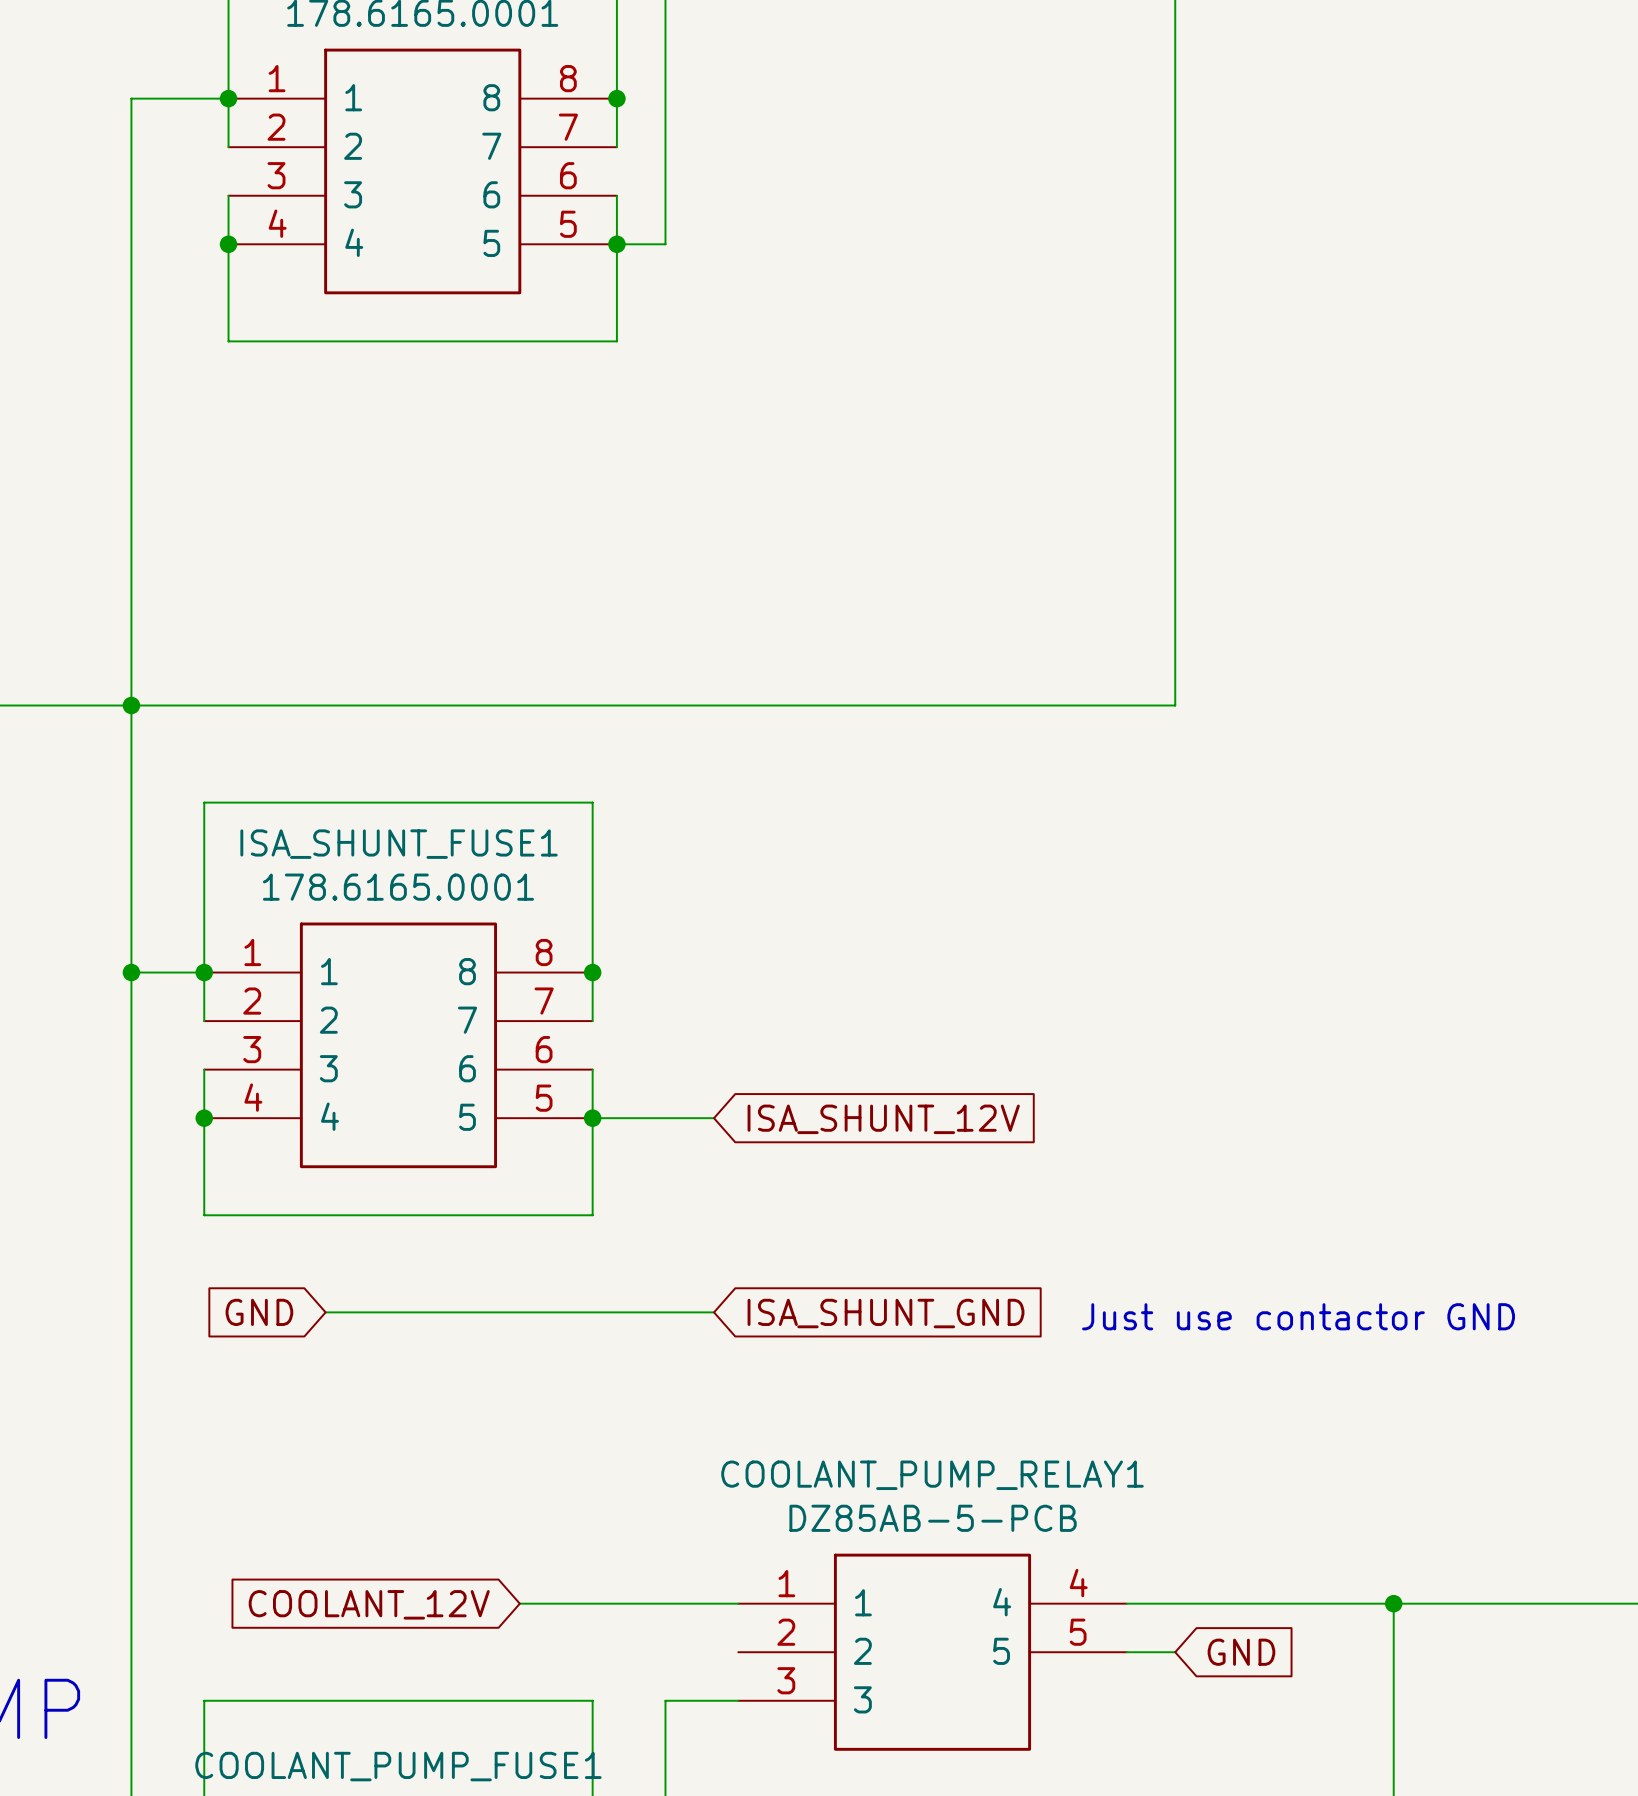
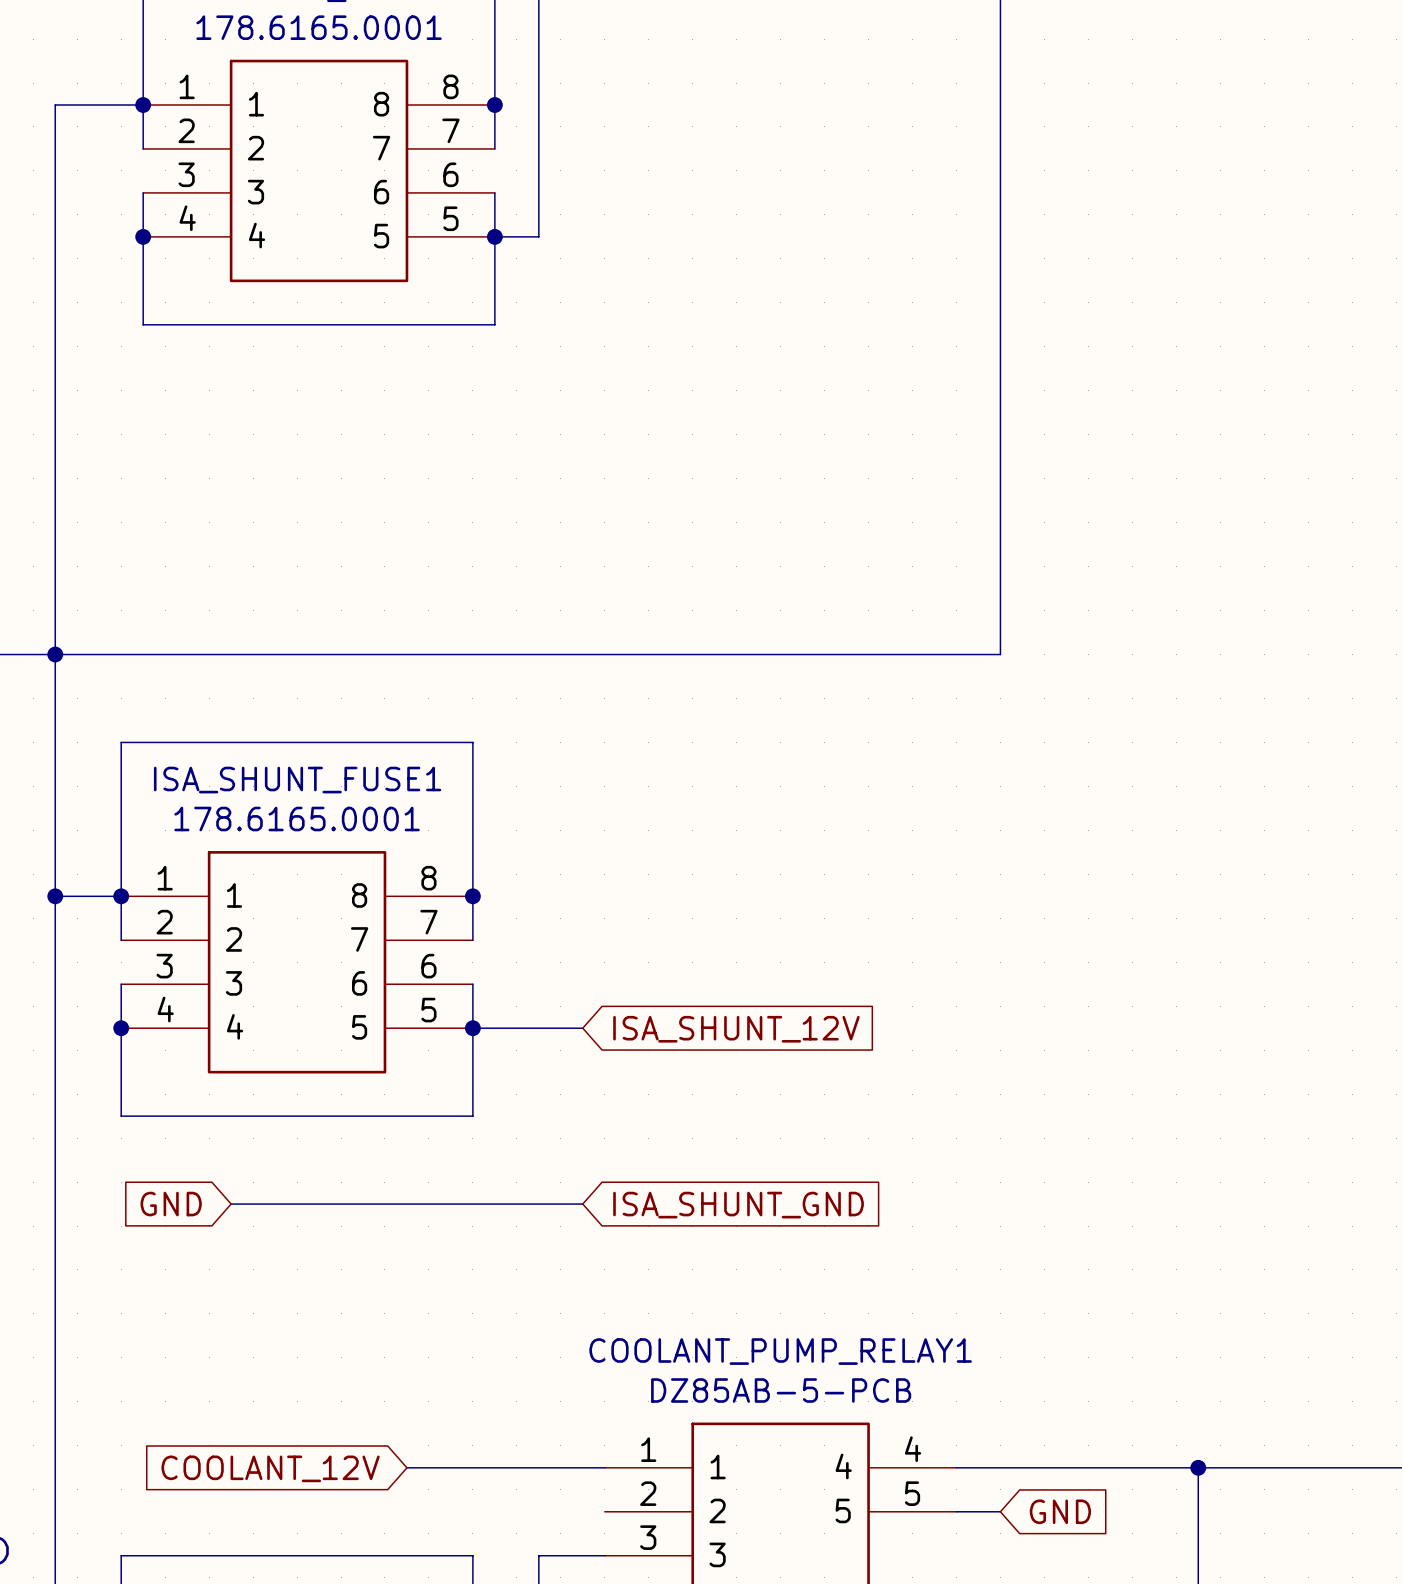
text: Just use contactor GND (1298, 1316) -> none

